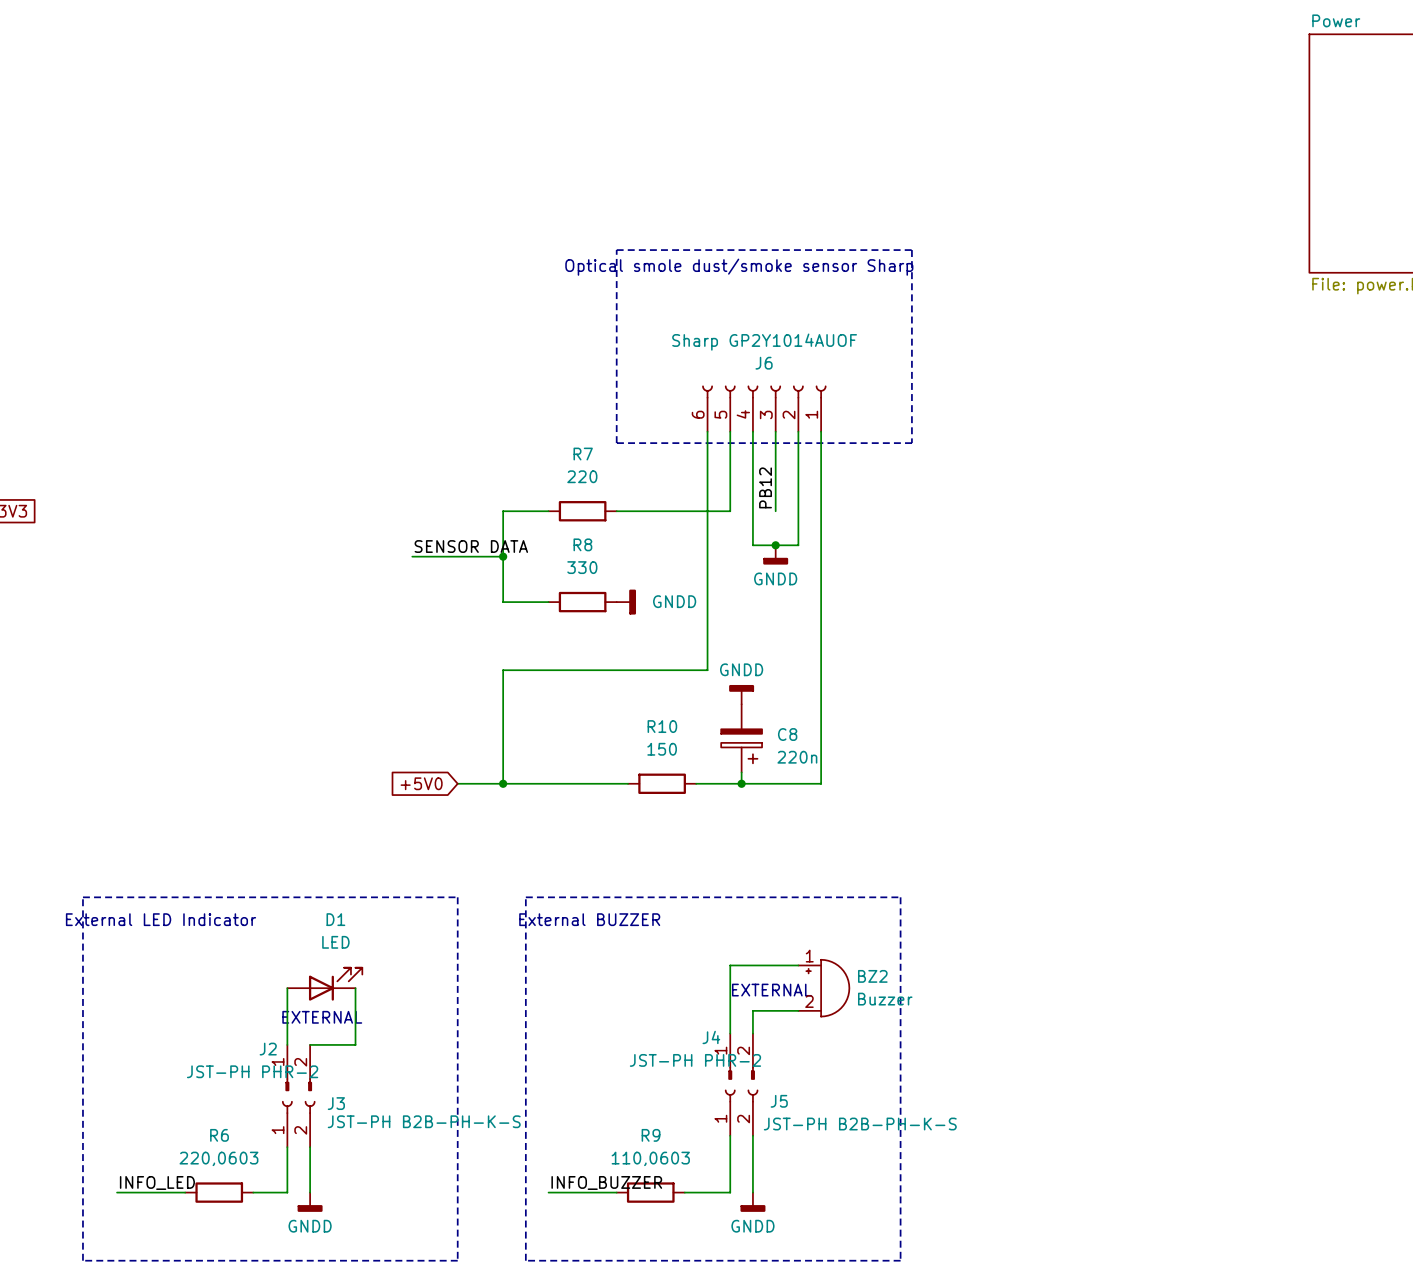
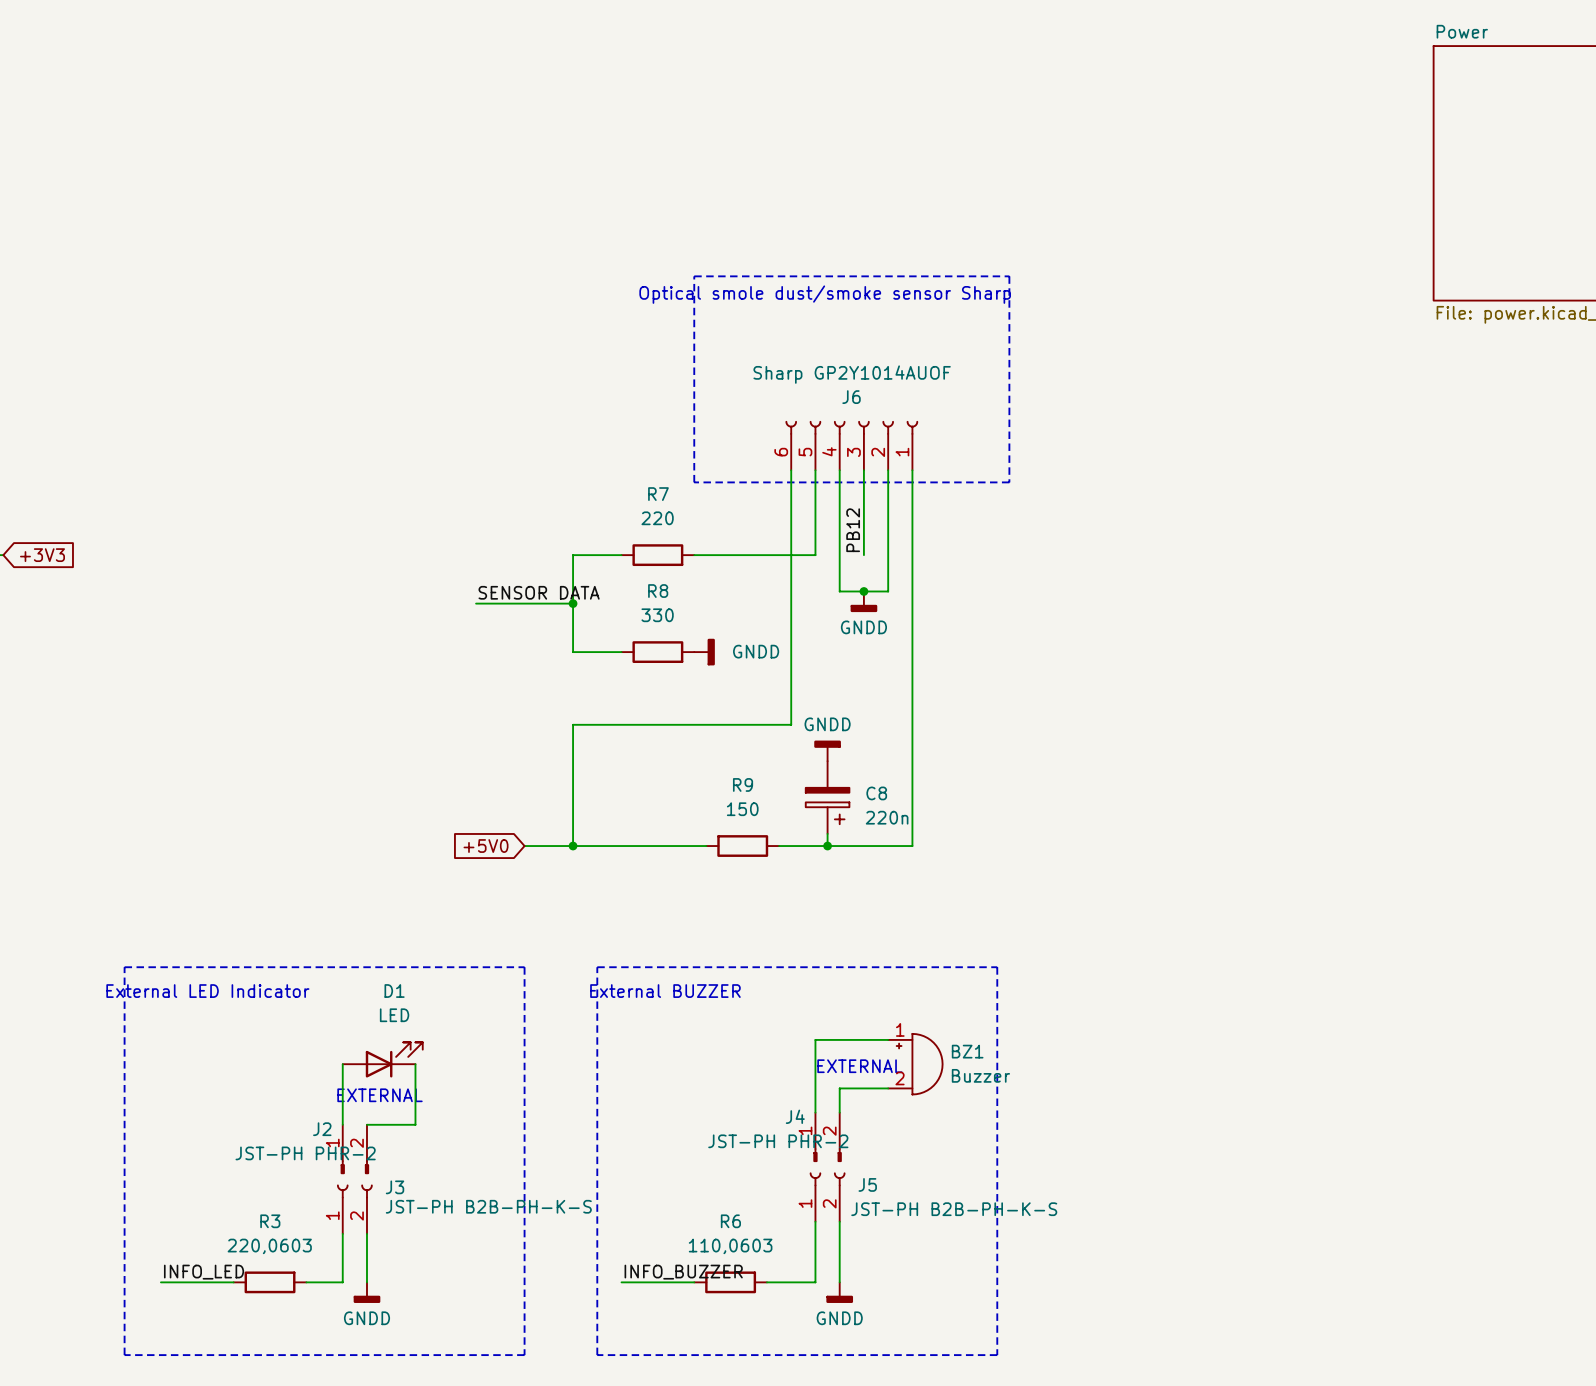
R10 name: R10 (662, 726) -> R9 (743, 784)
BZ2 name: BZ2 (872, 976) -> BZ1 (967, 1051)
R6 name: R6 (219, 1135) -> R3 (270, 1221)
R9 name: R9 (651, 1135) -> R6 (730, 1221)

